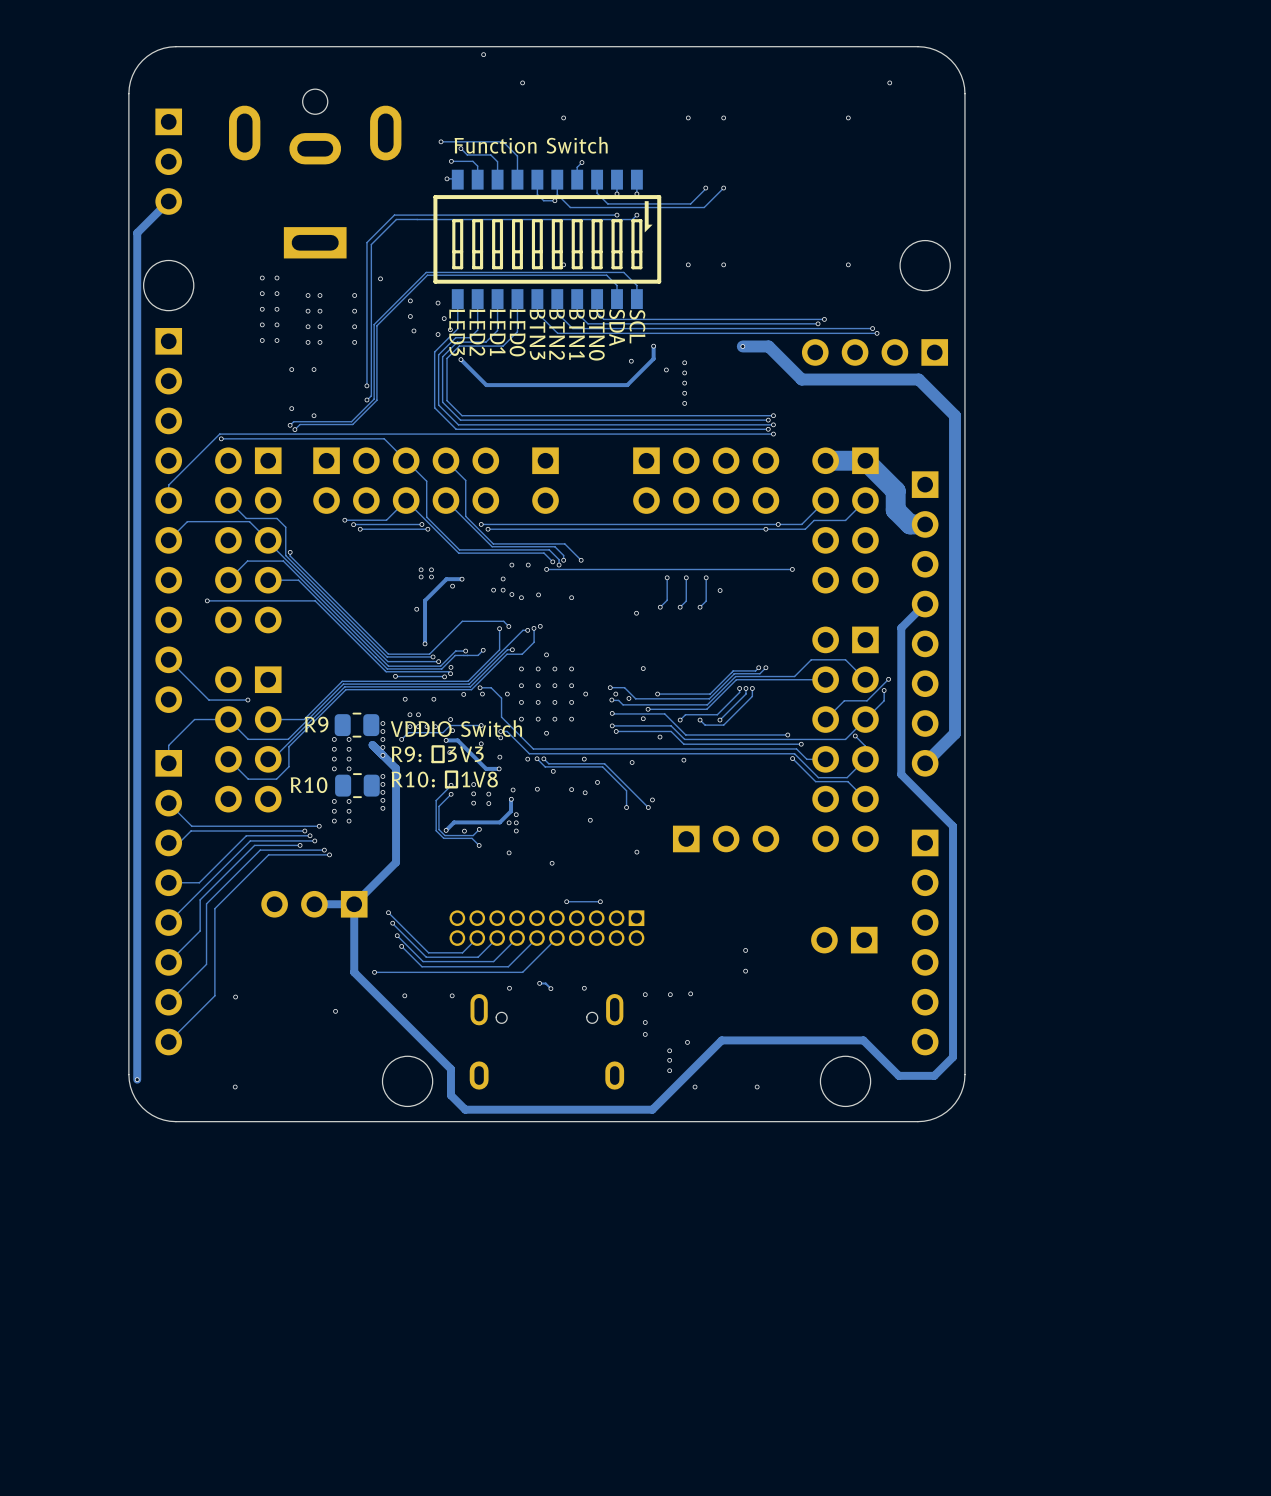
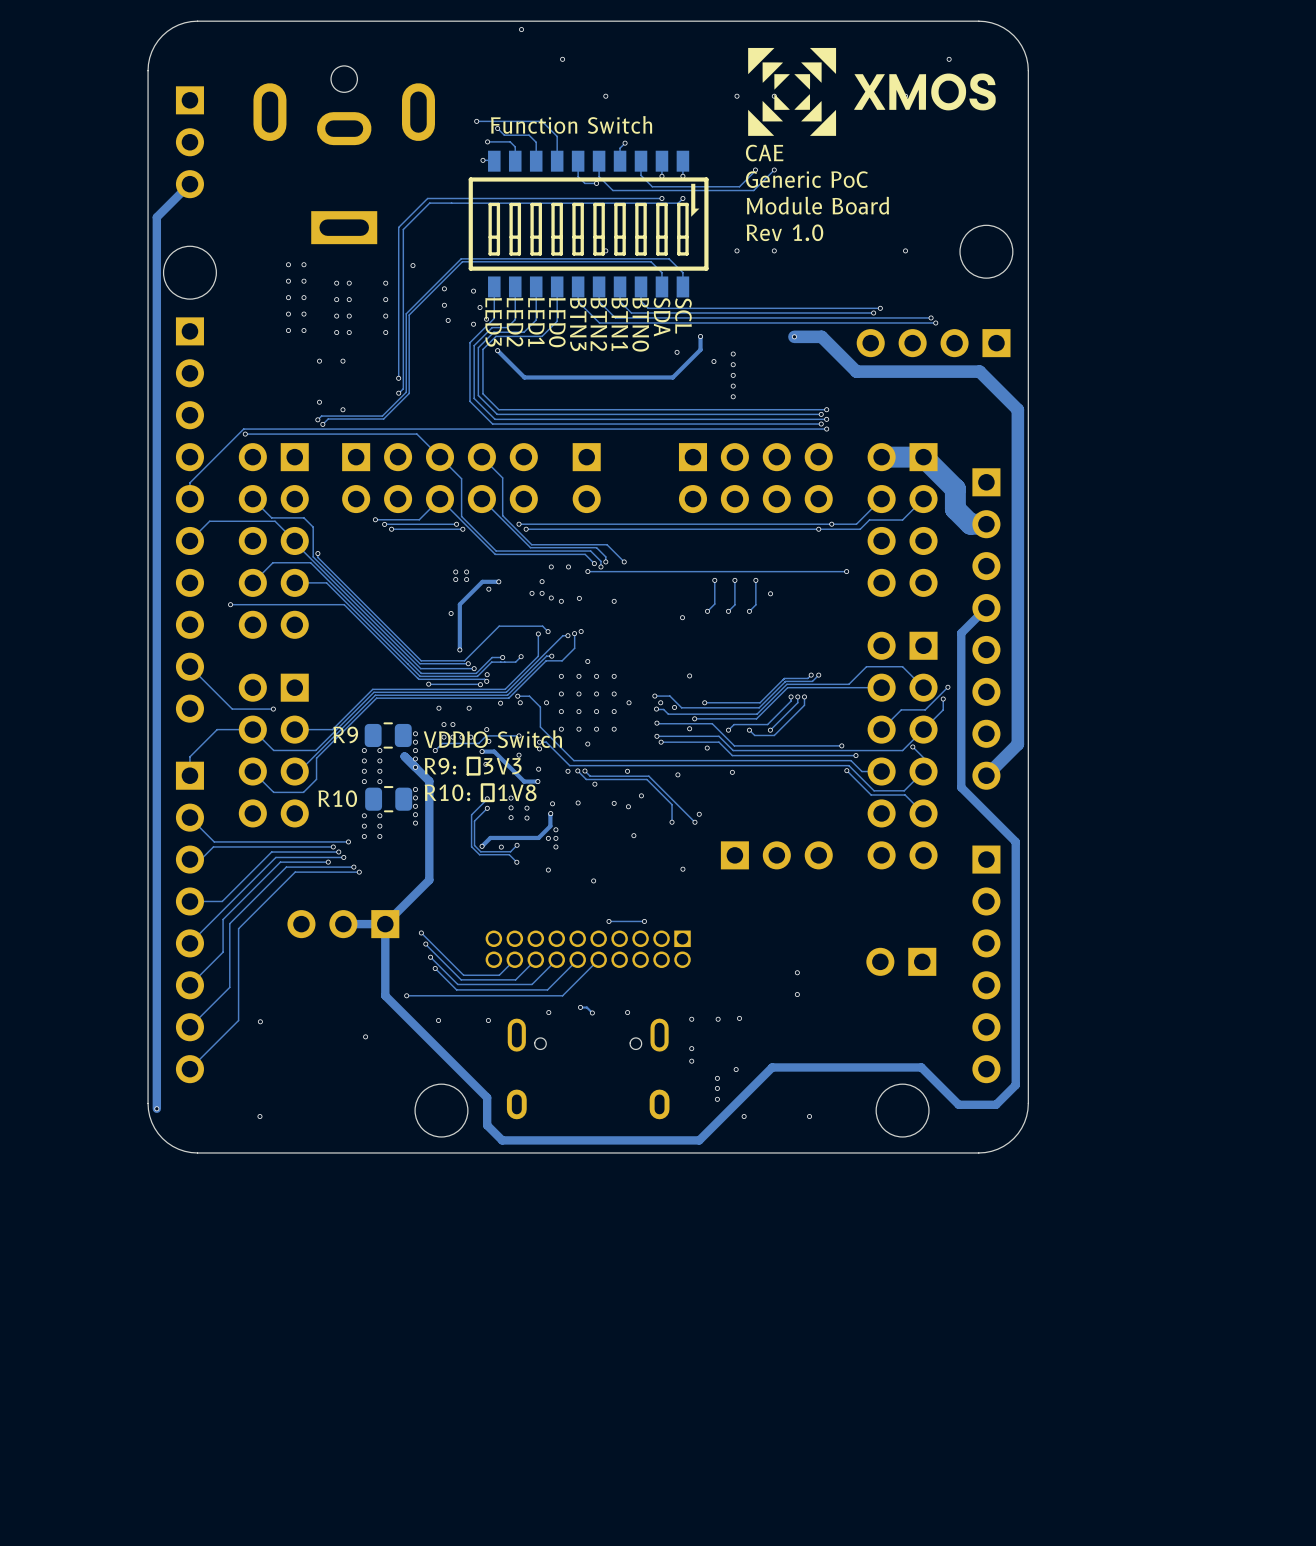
drawing: none -> [748, 47, 996, 136]
text: none -> CAE (764, 153)
text: none -> Generic PoC (806, 179)
text: none -> Module Board (817, 205)
text: none -> Rev 1.0 (784, 232)

